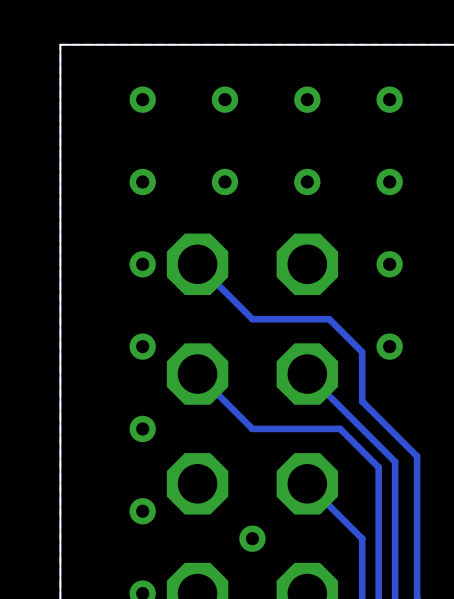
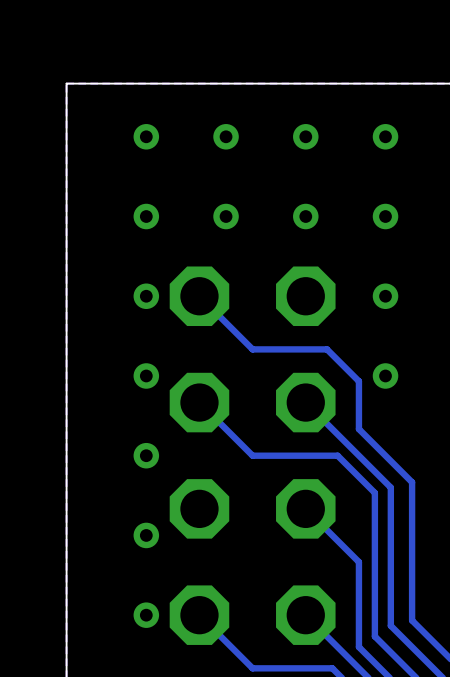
via: (252, 538) -> none

